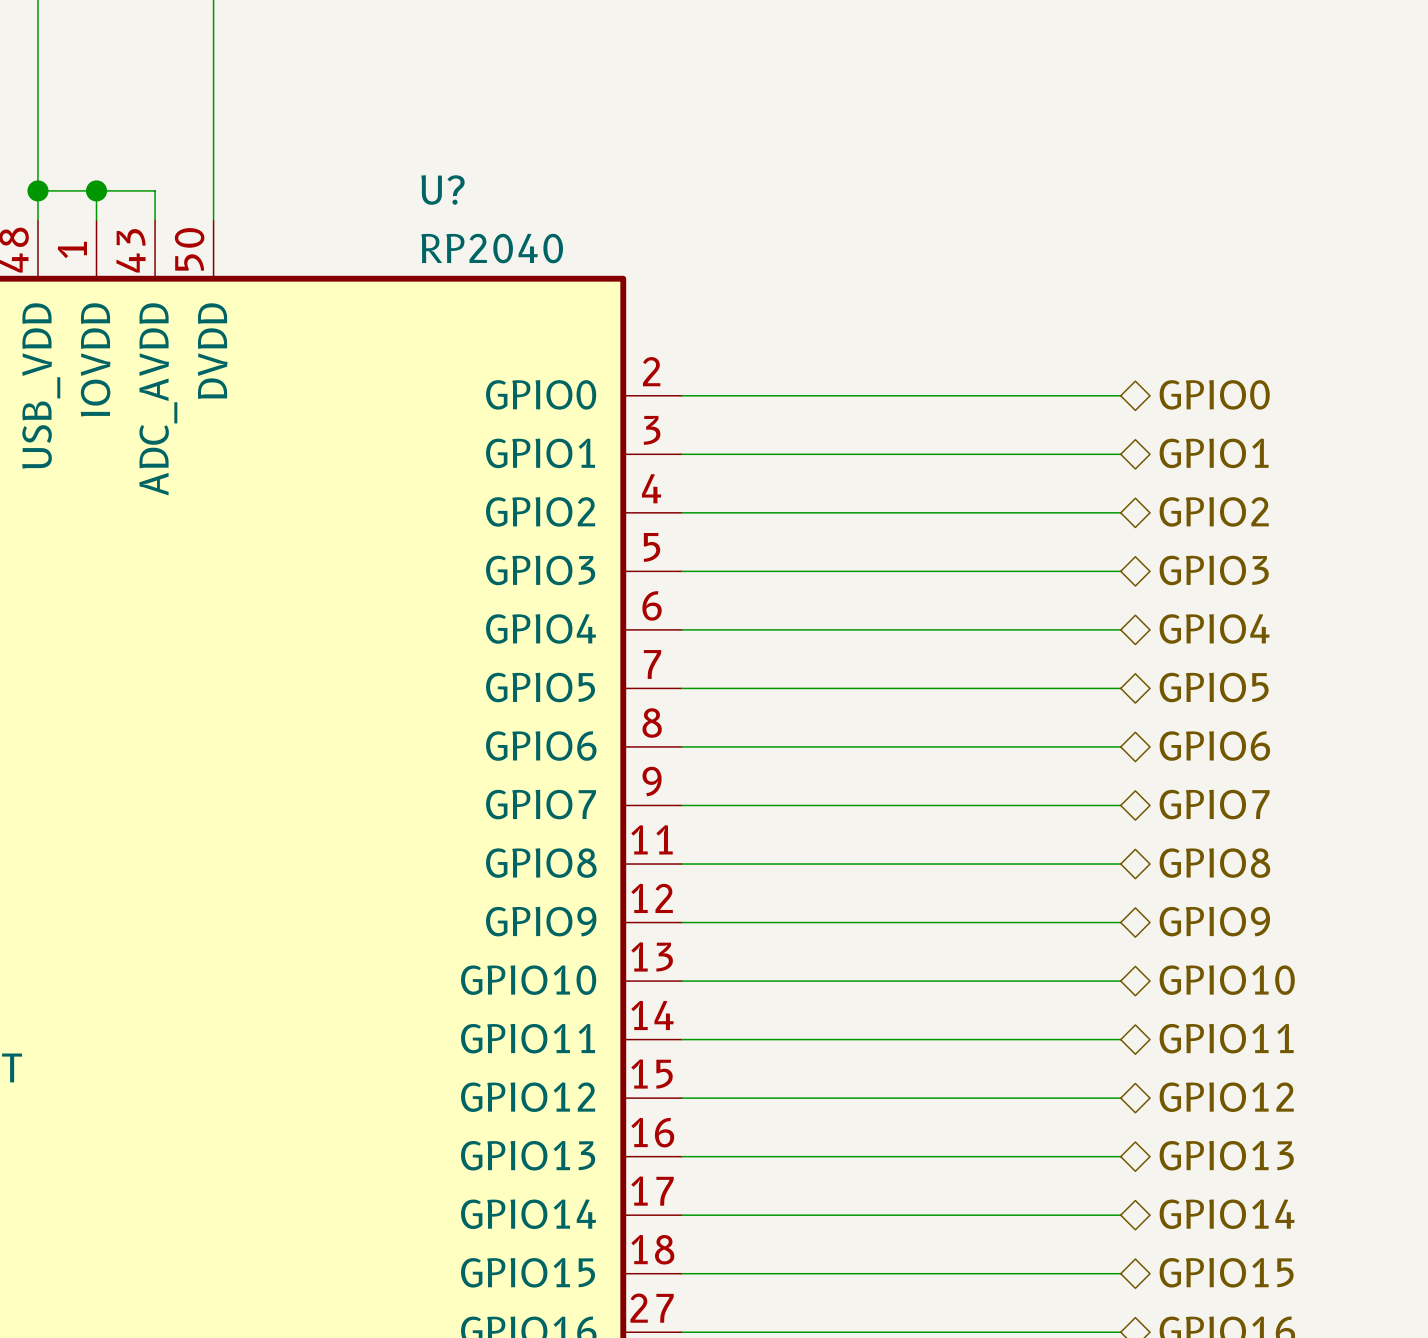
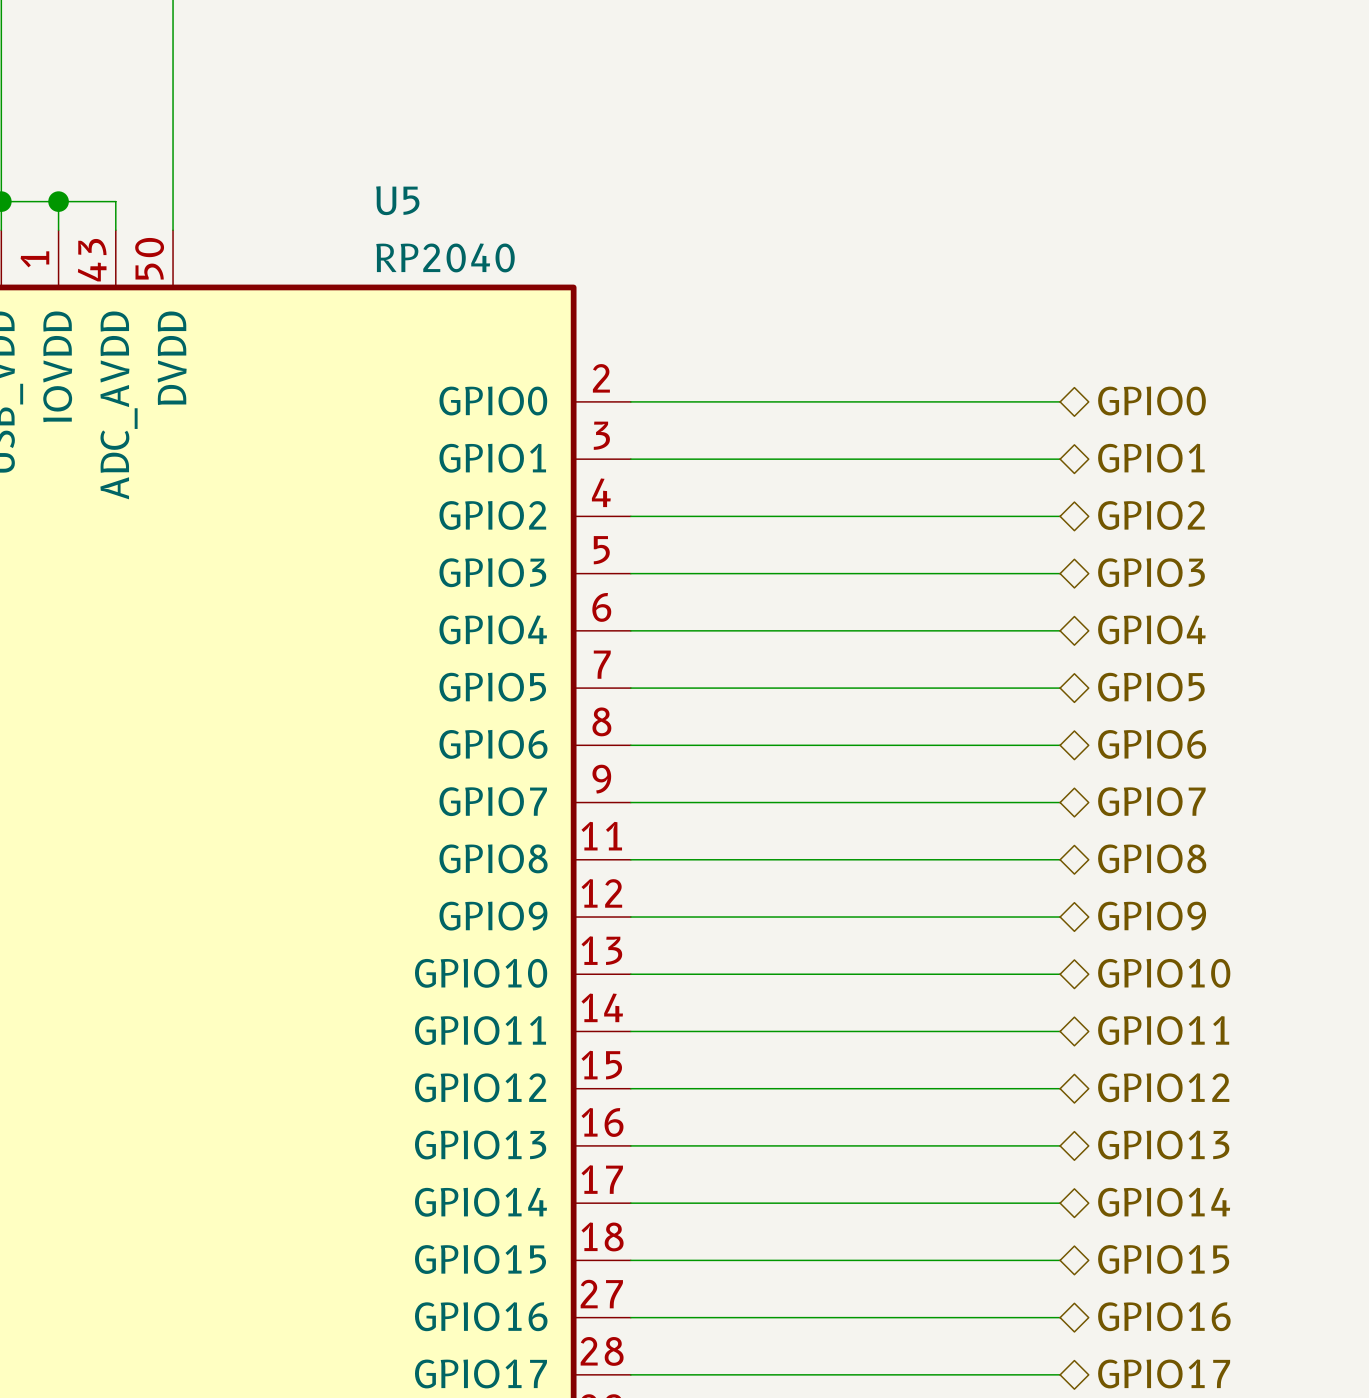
U? name: U? (442, 190) -> U5 (397, 200)

